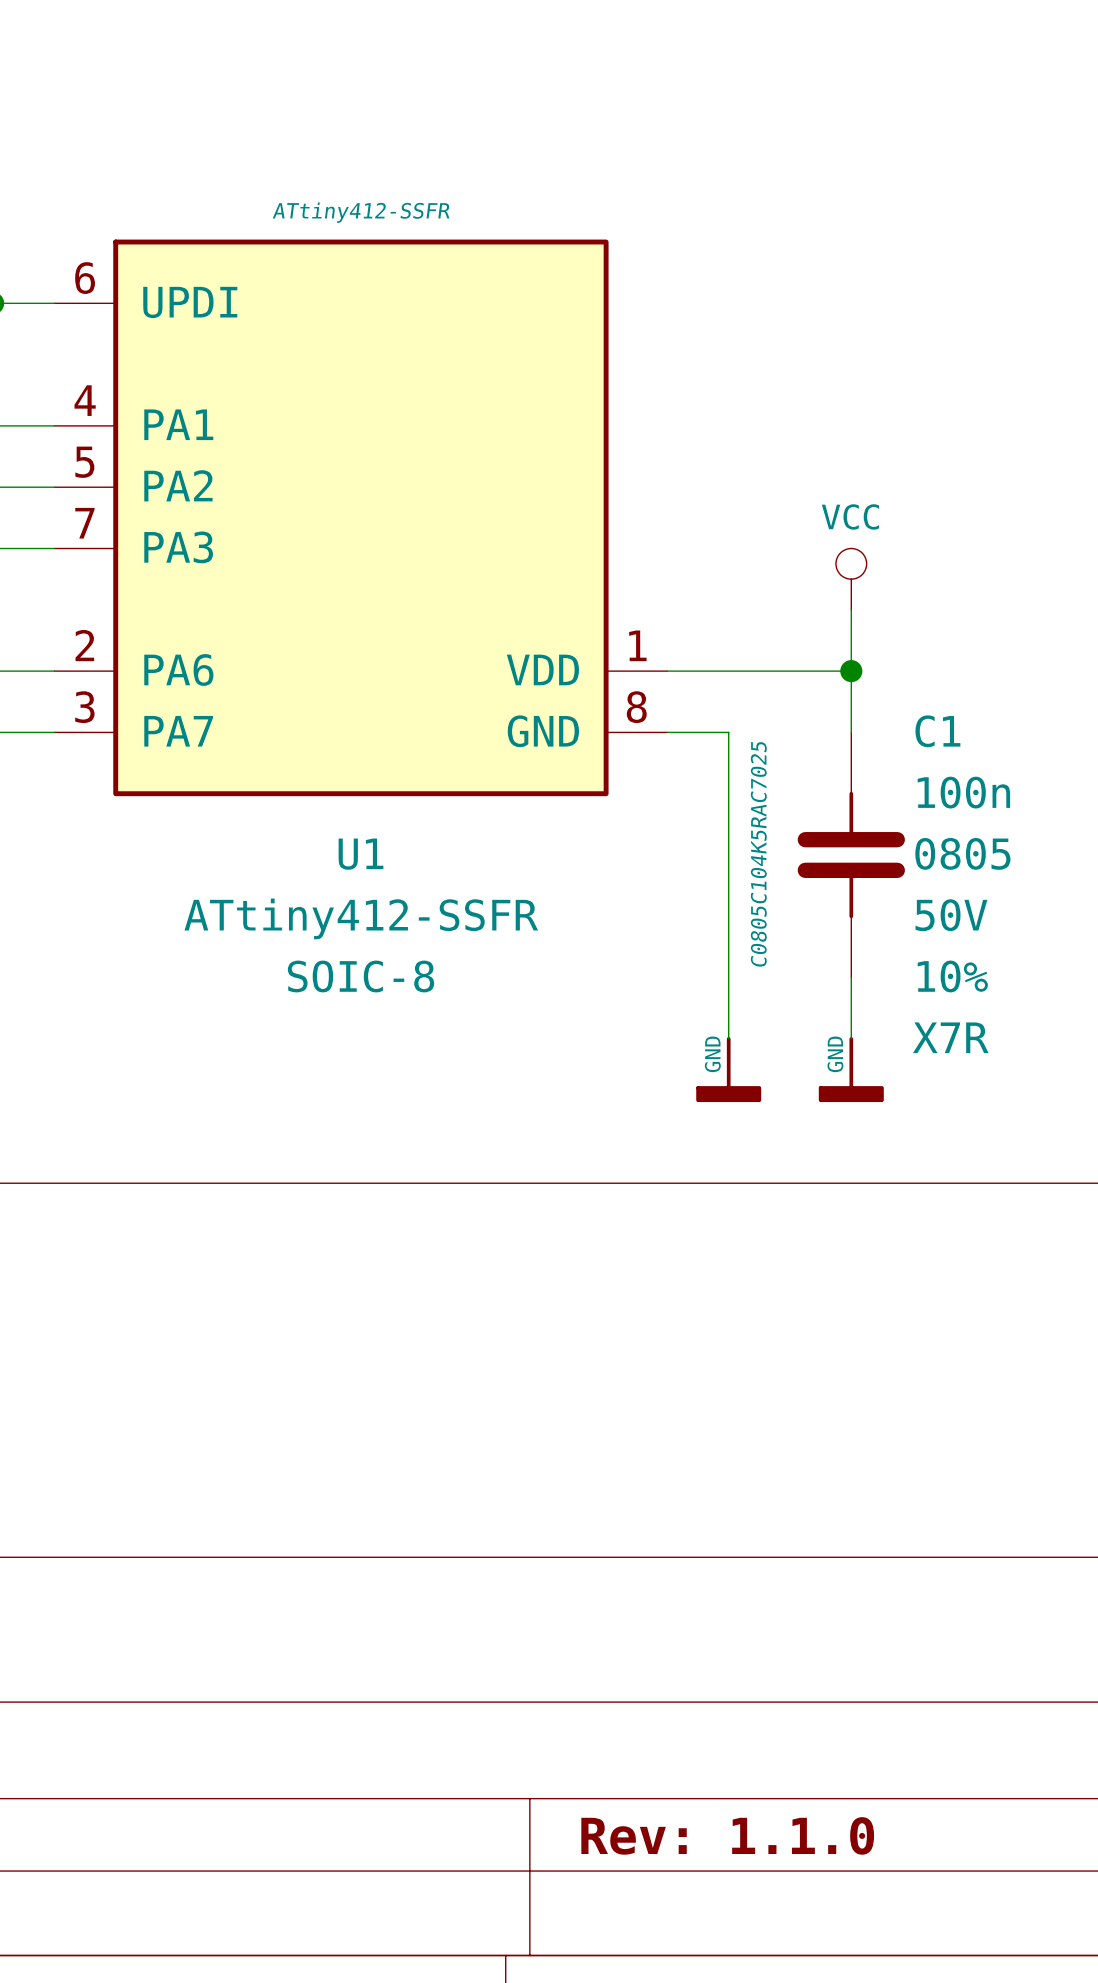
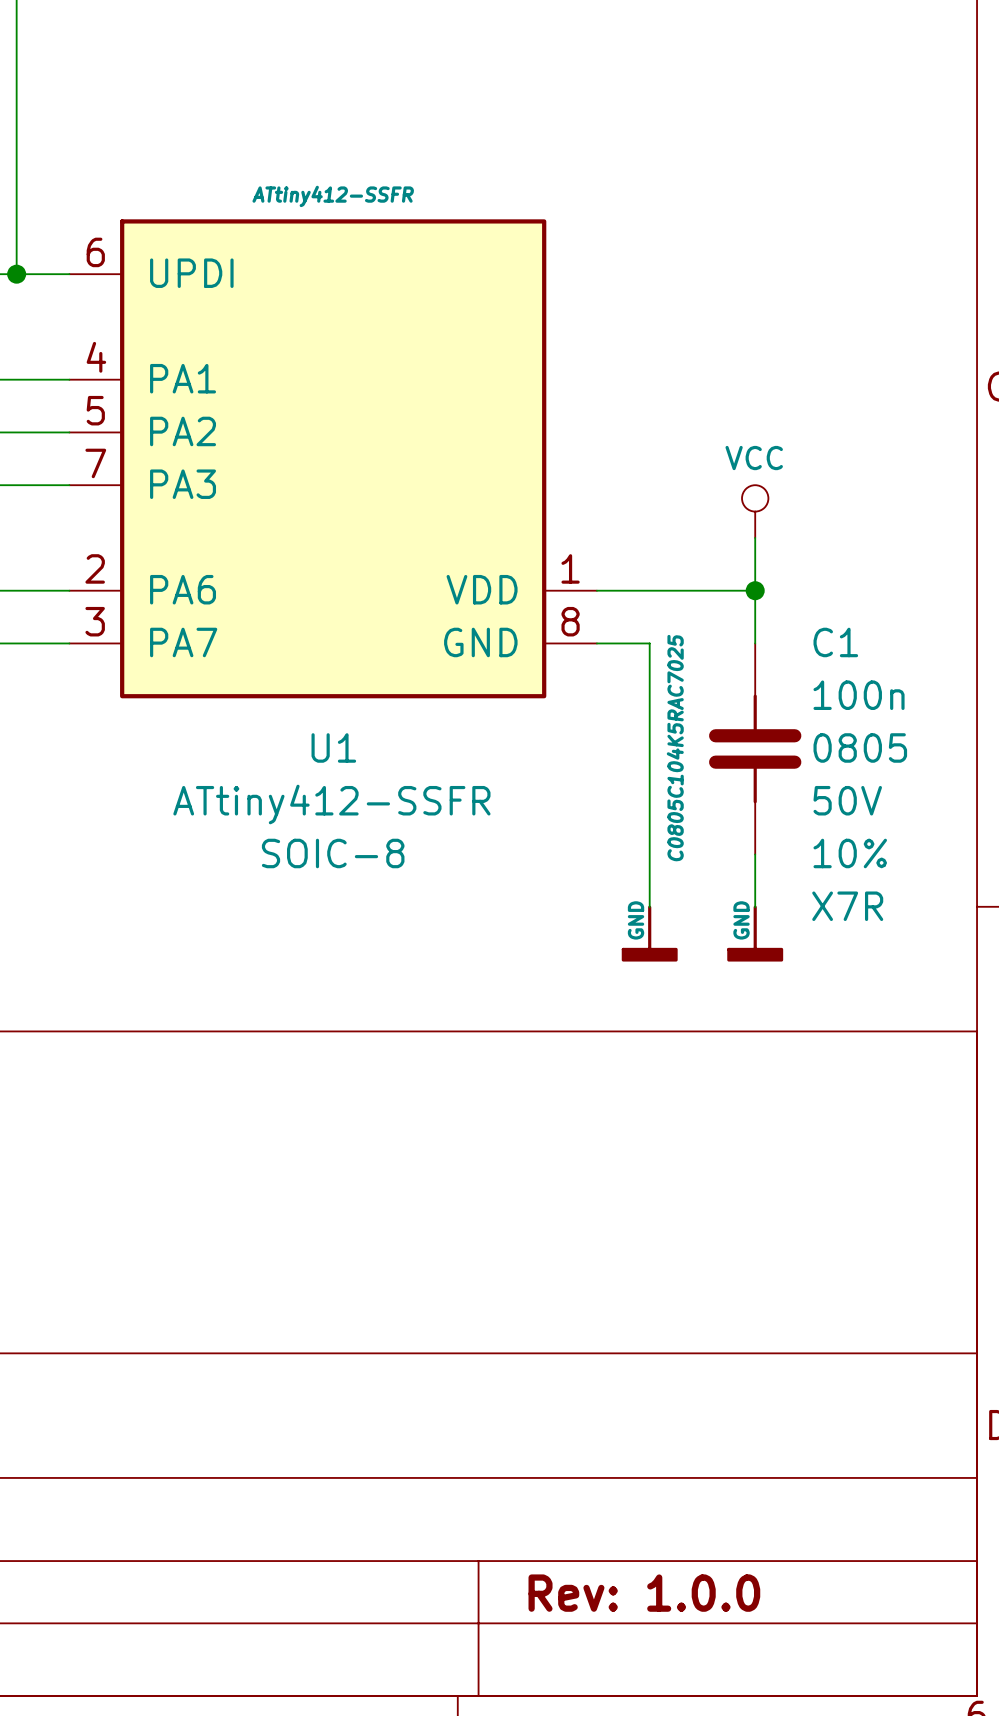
title block: Rev: 1.1.0 (727, 1835) -> Rev: 1.0.0 (644, 1593)

